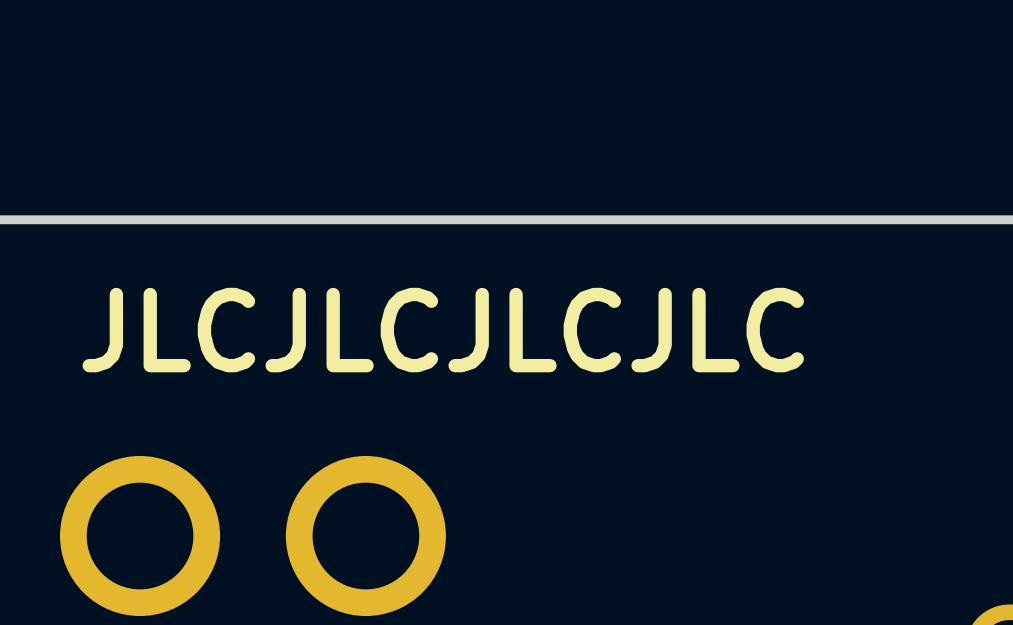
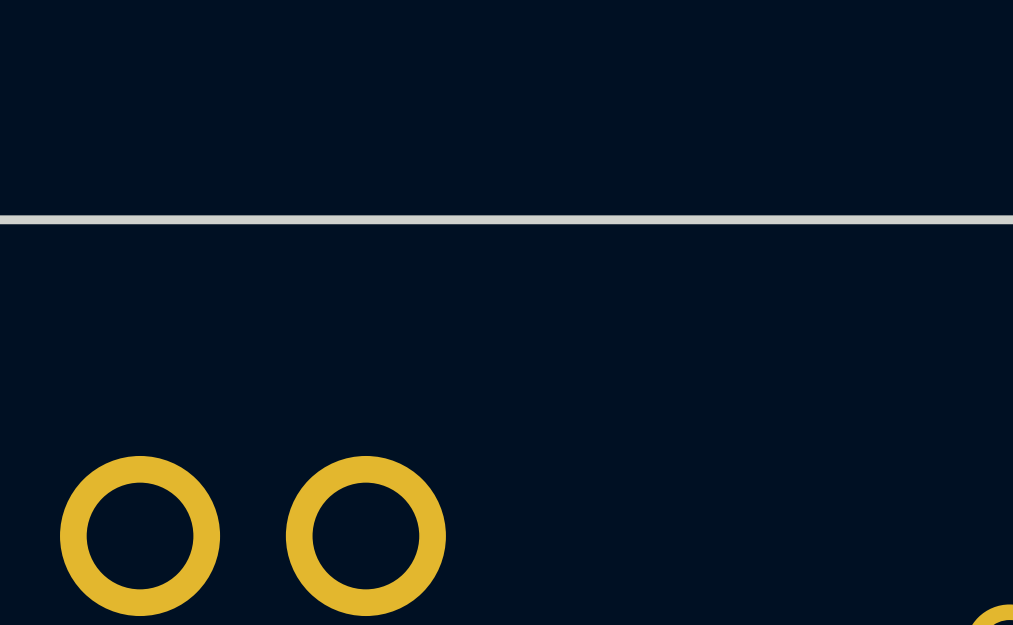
drawing: [82, 287, 804, 373] -> none

